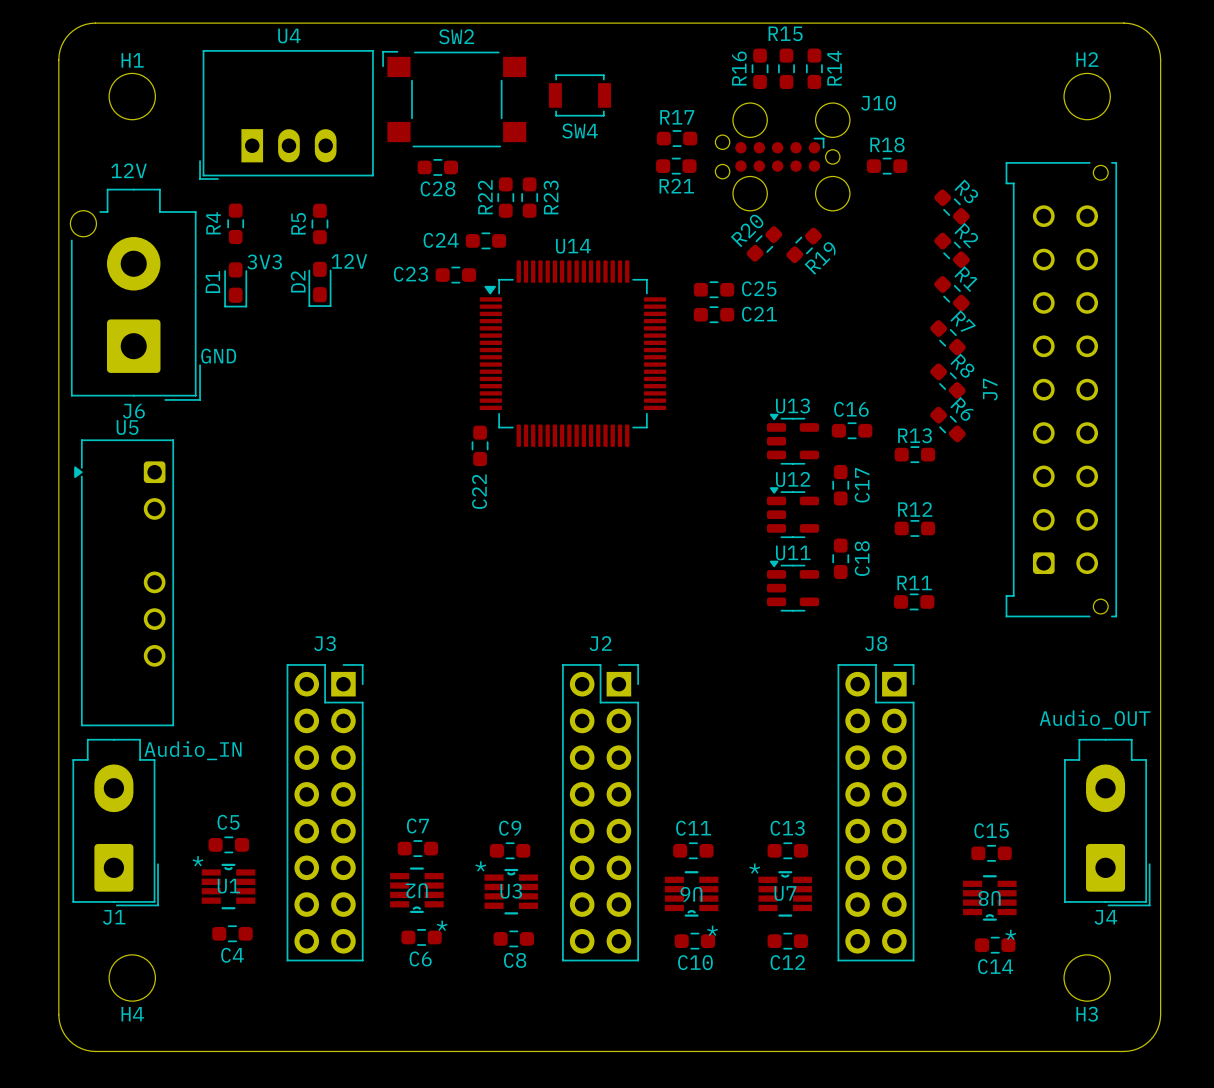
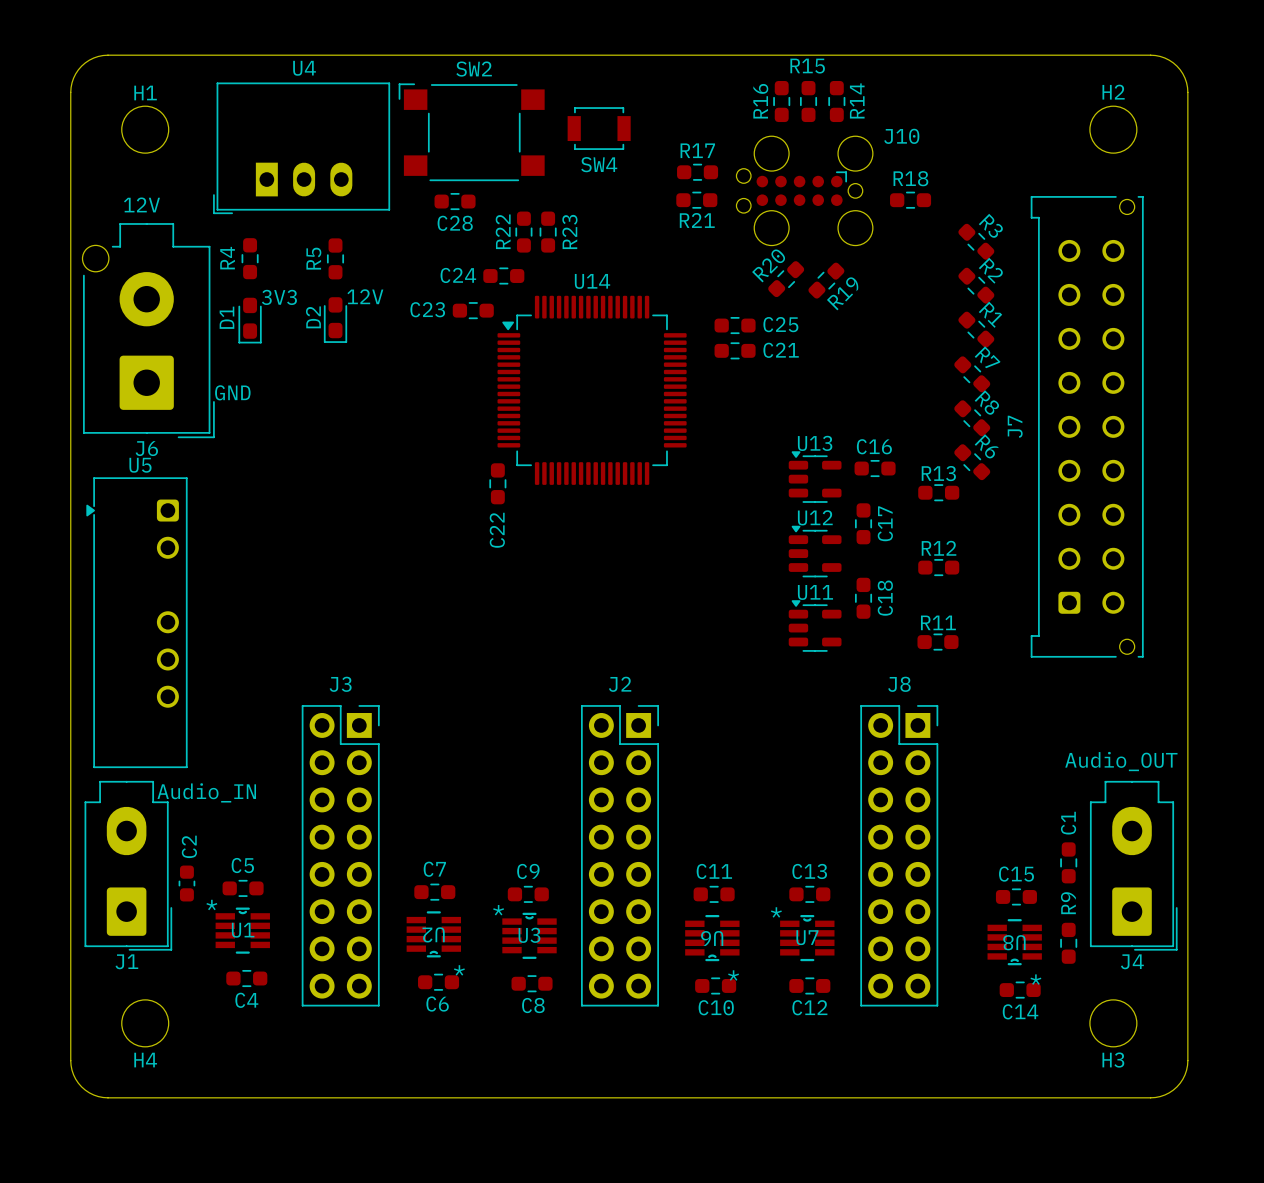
C1: none -> (1068, 862)
C2: none -> (186, 883)
R9: none -> (1068, 943)

